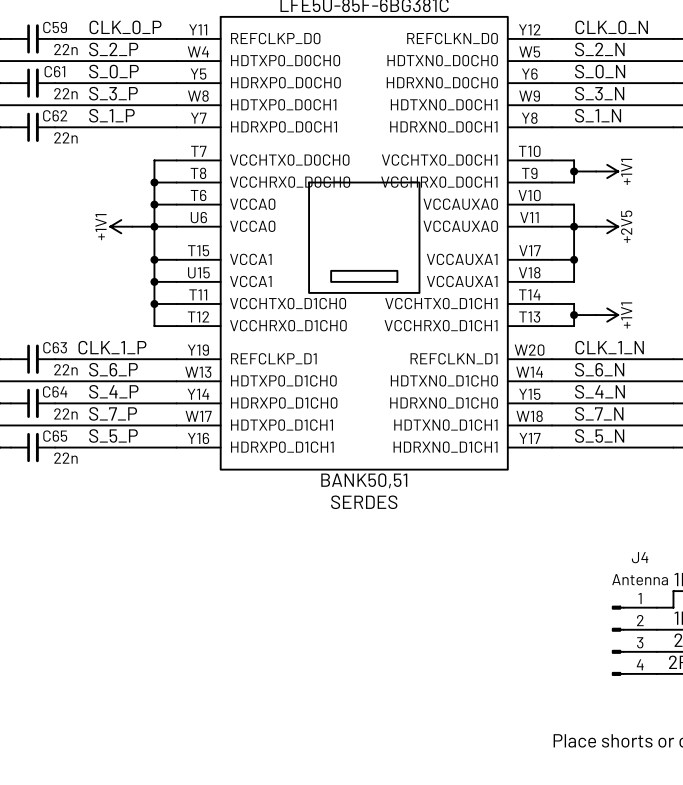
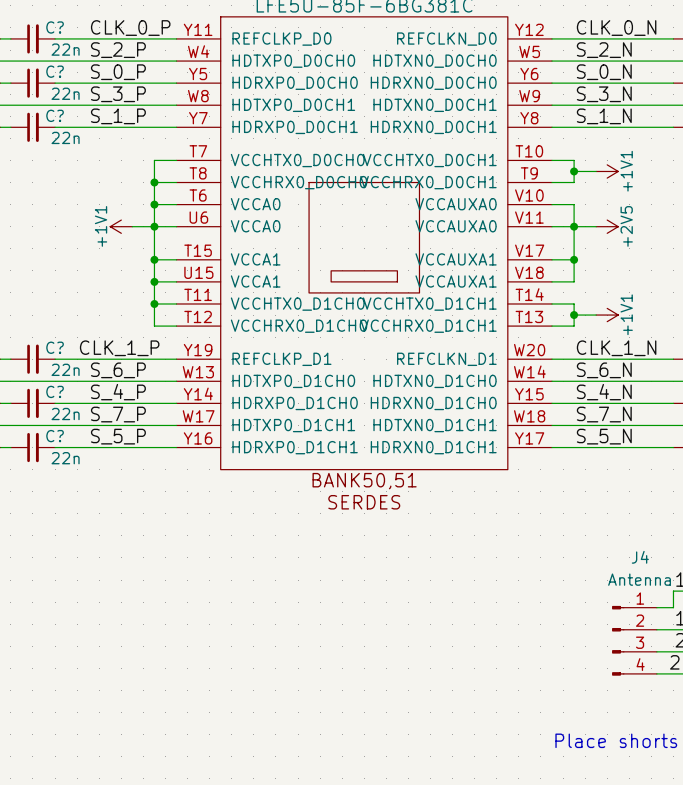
C59 name: C59 (55, 27) -> C? (55, 27)
C61 name: C61 (54, 71) -> C? (55, 71)
C62 name: C62 (55, 115) -> C? (55, 115)
C63 name: C63 (55, 347) -> C? (55, 347)
C64 name: C64 (55, 391) -> C? (55, 391)
C65 name: C65 (55, 436) -> C? (55, 436)

